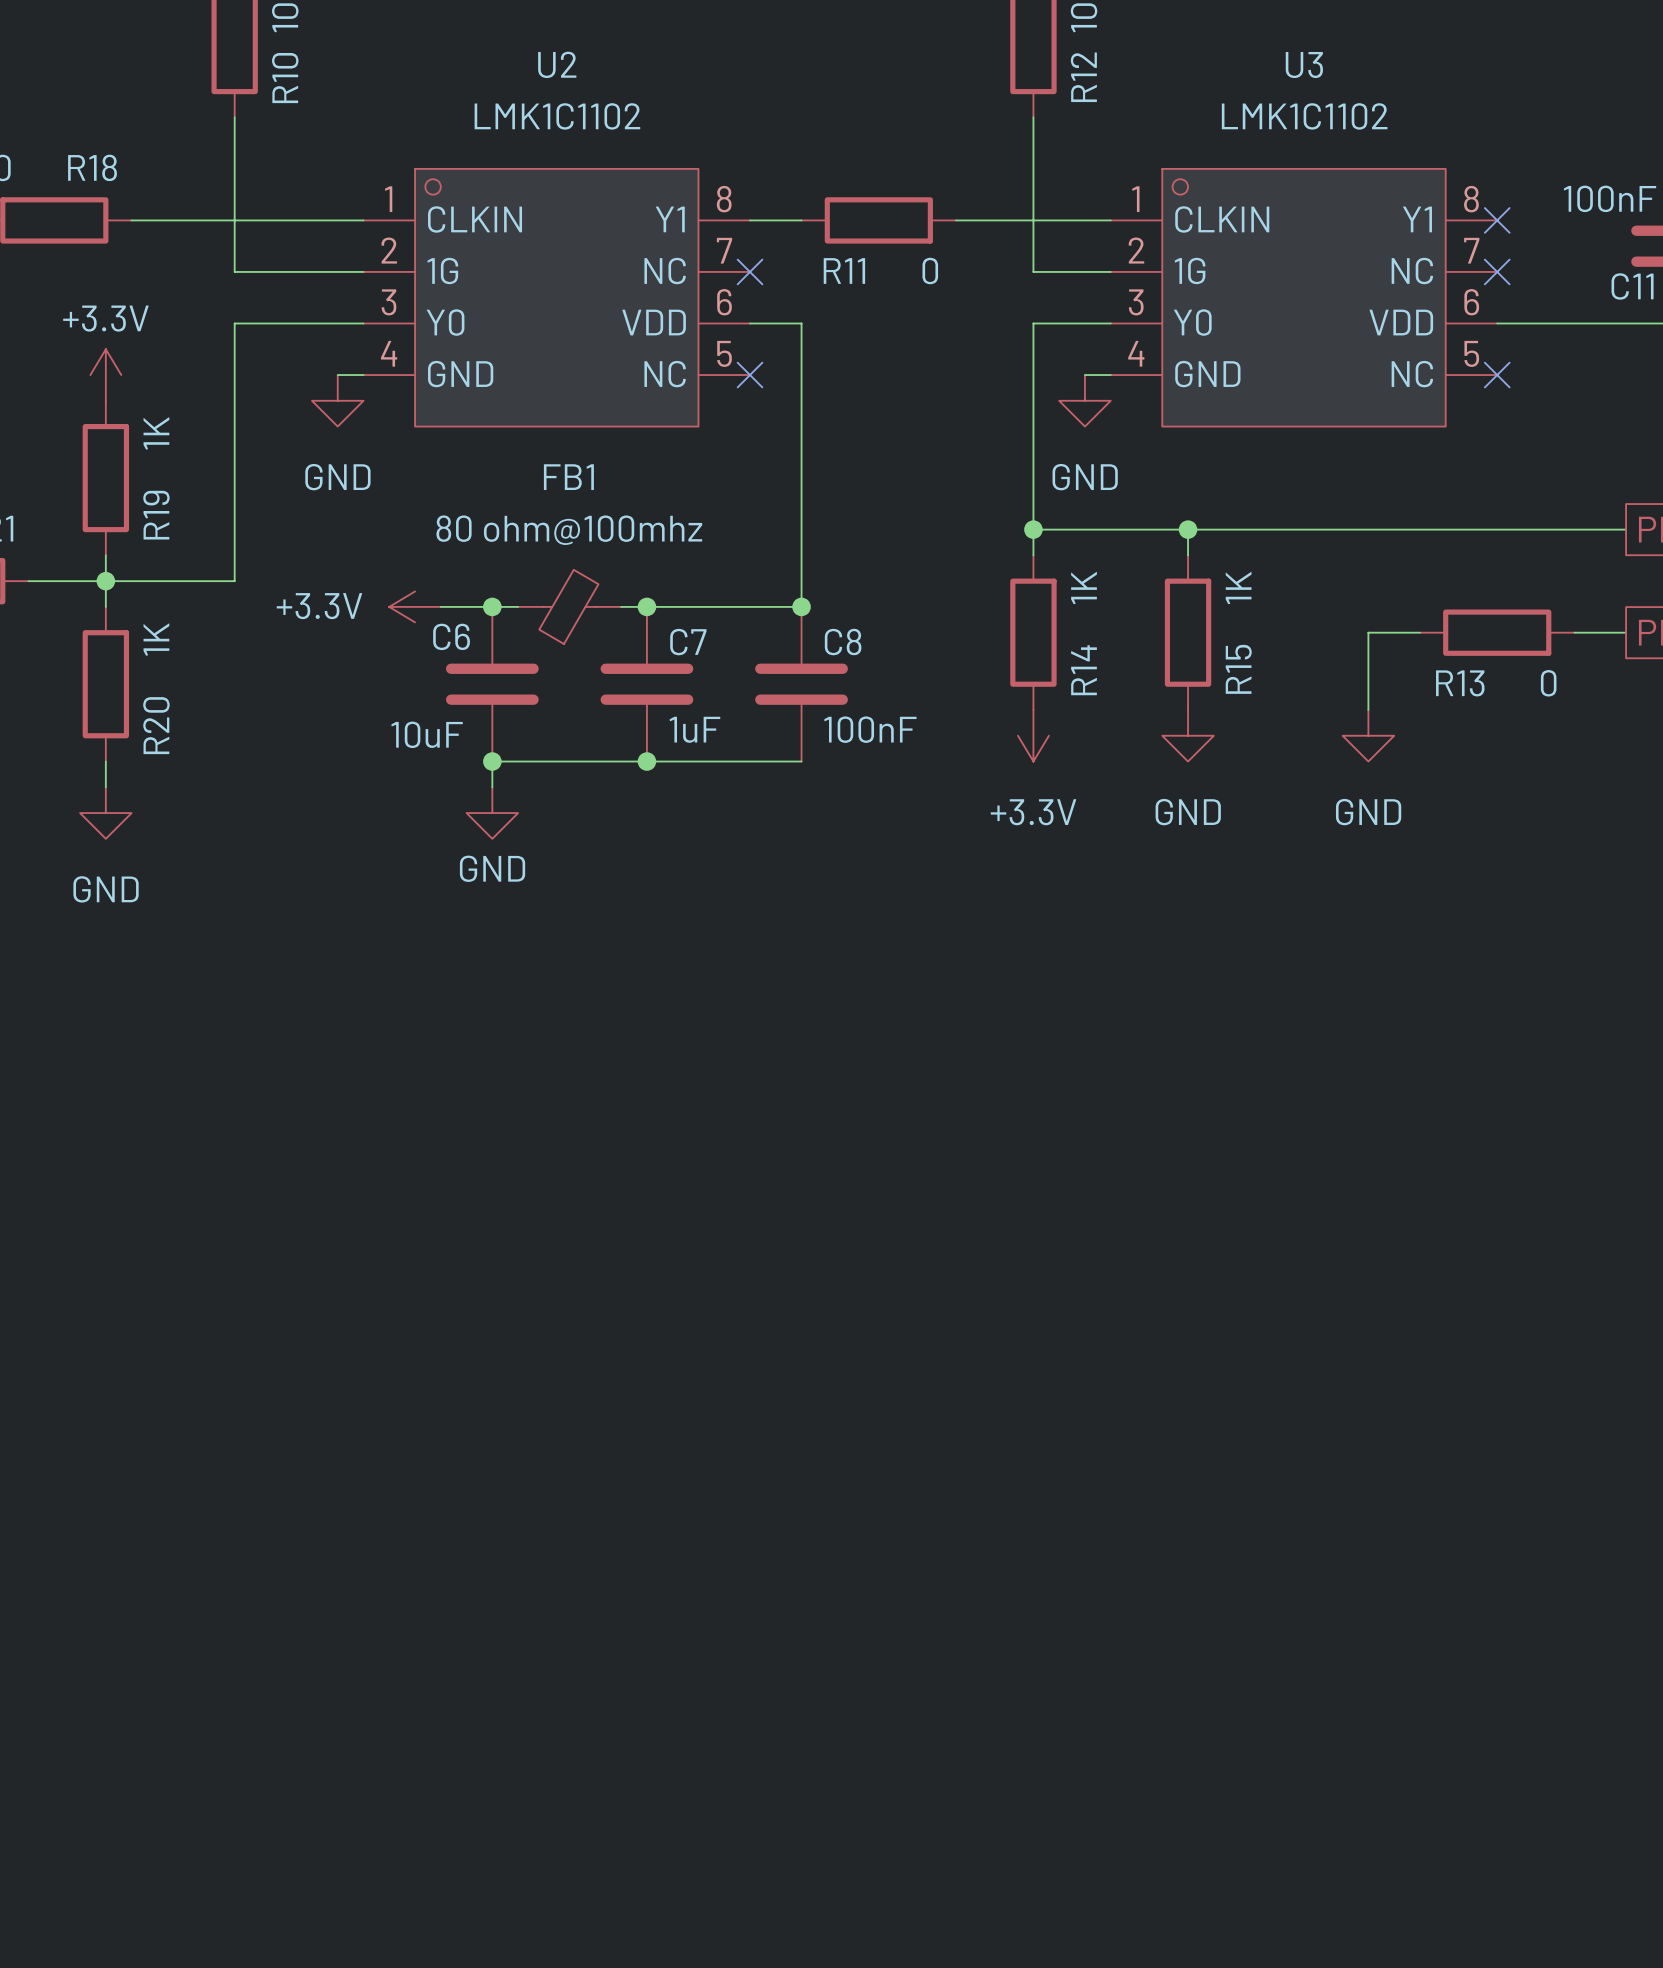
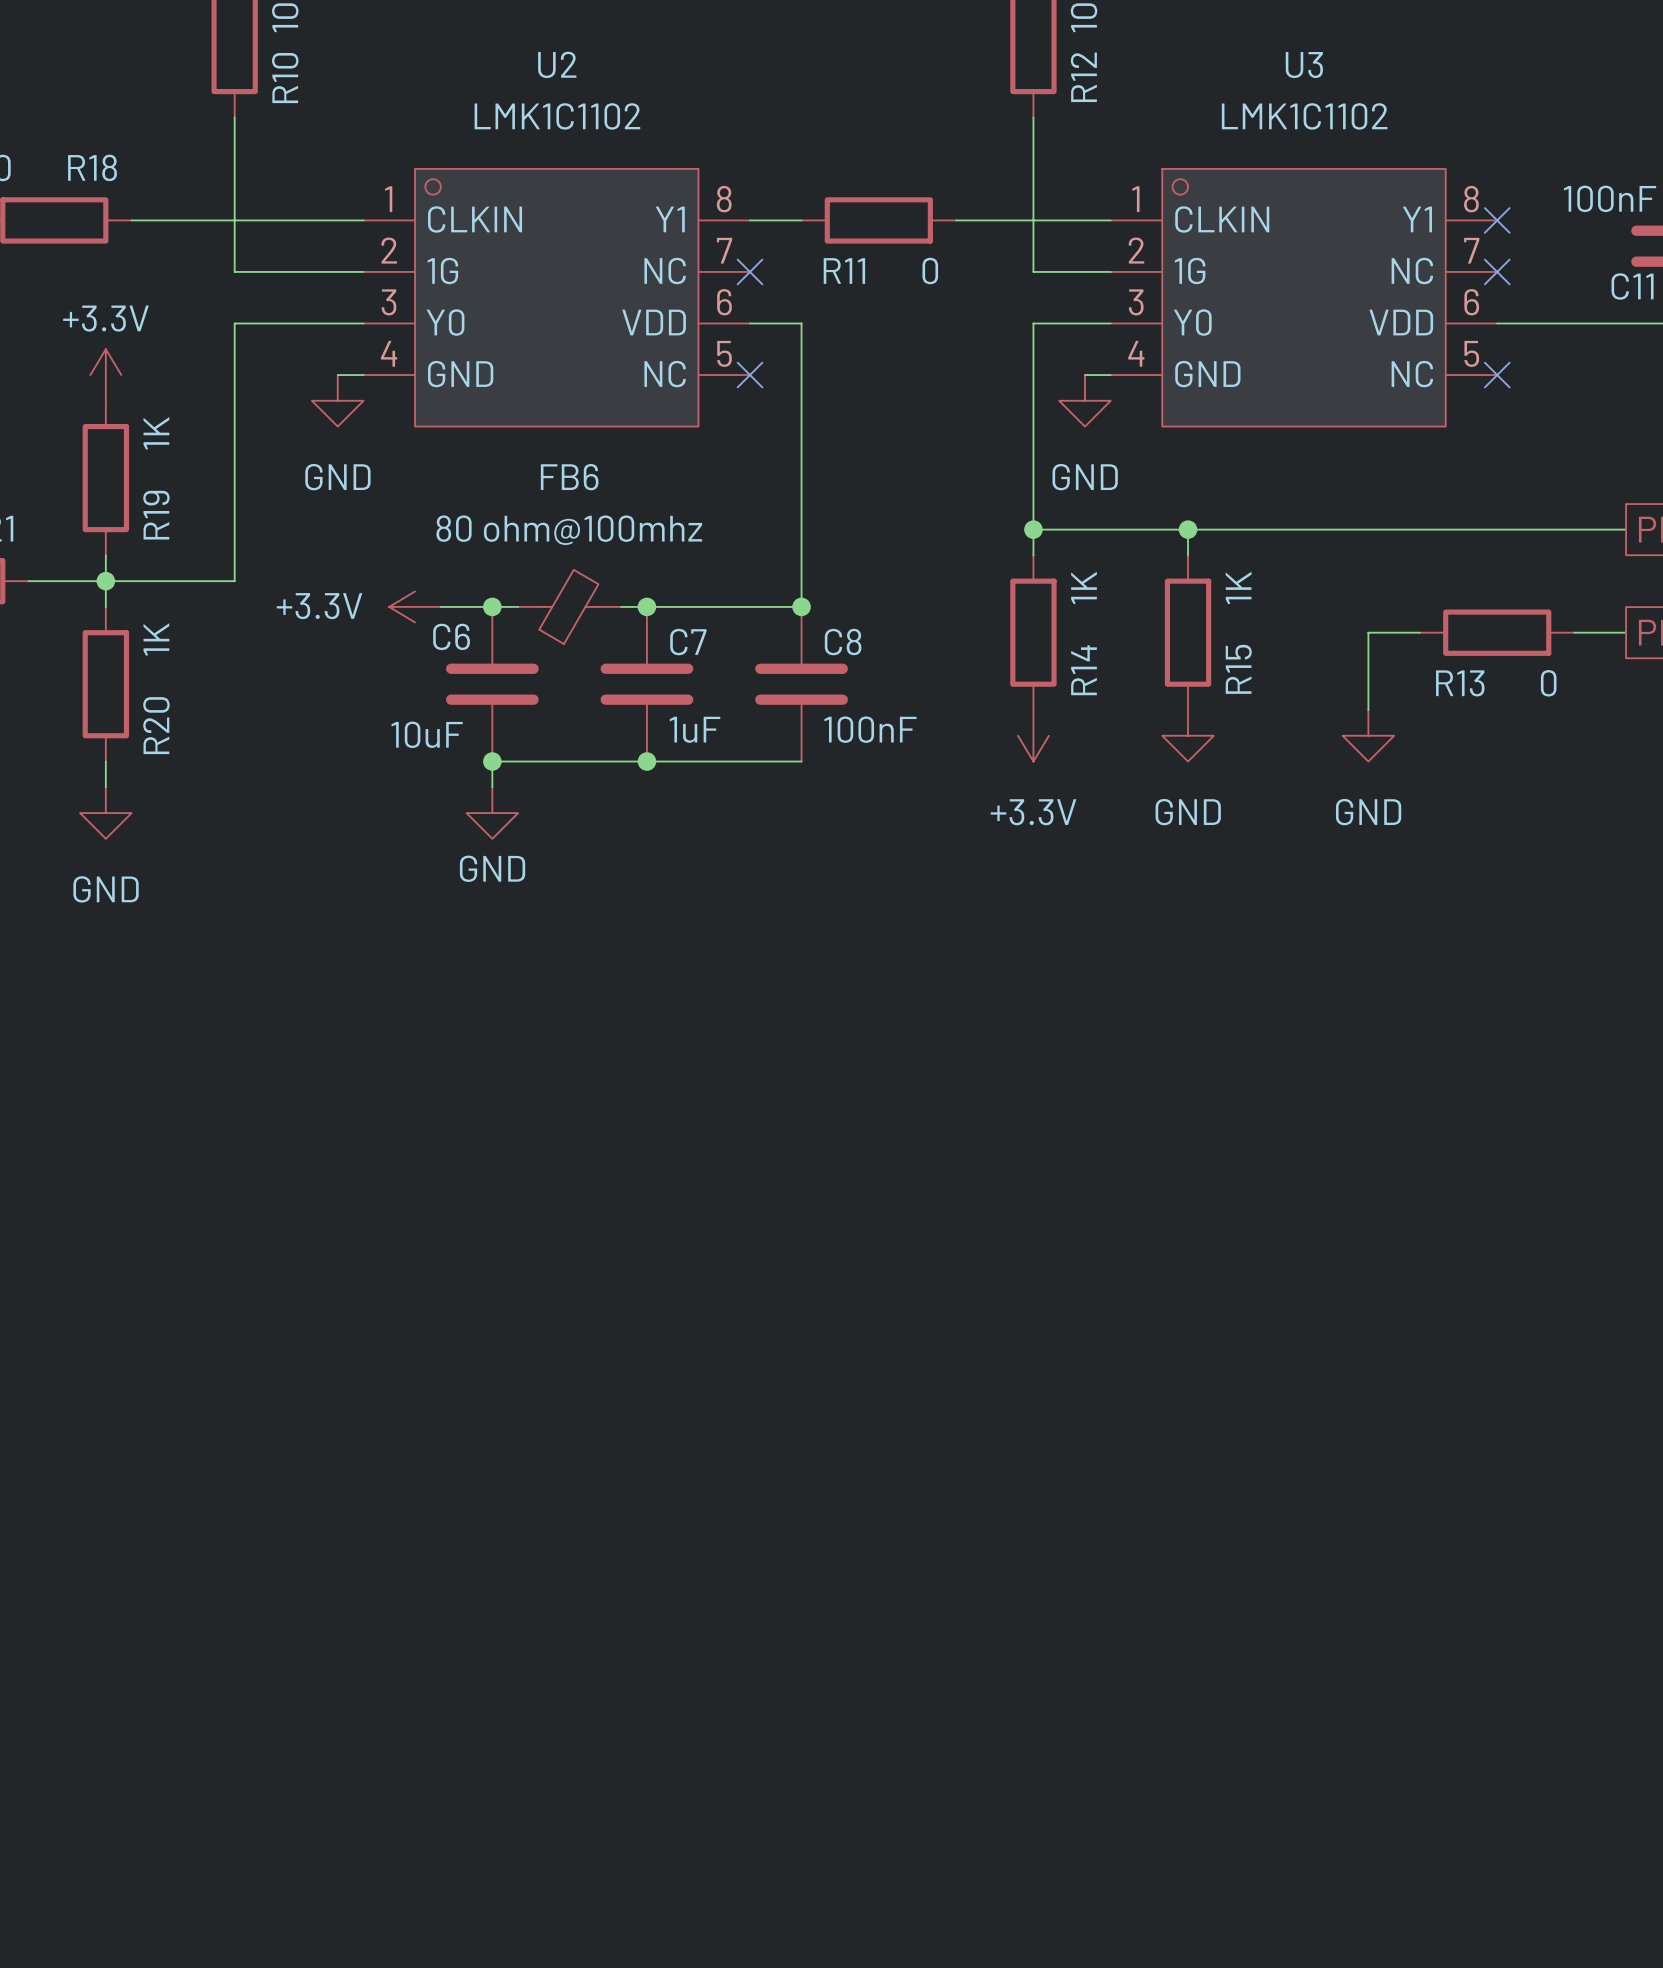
FB1 name: FB1 (568, 477) -> FB6 (569, 477)

